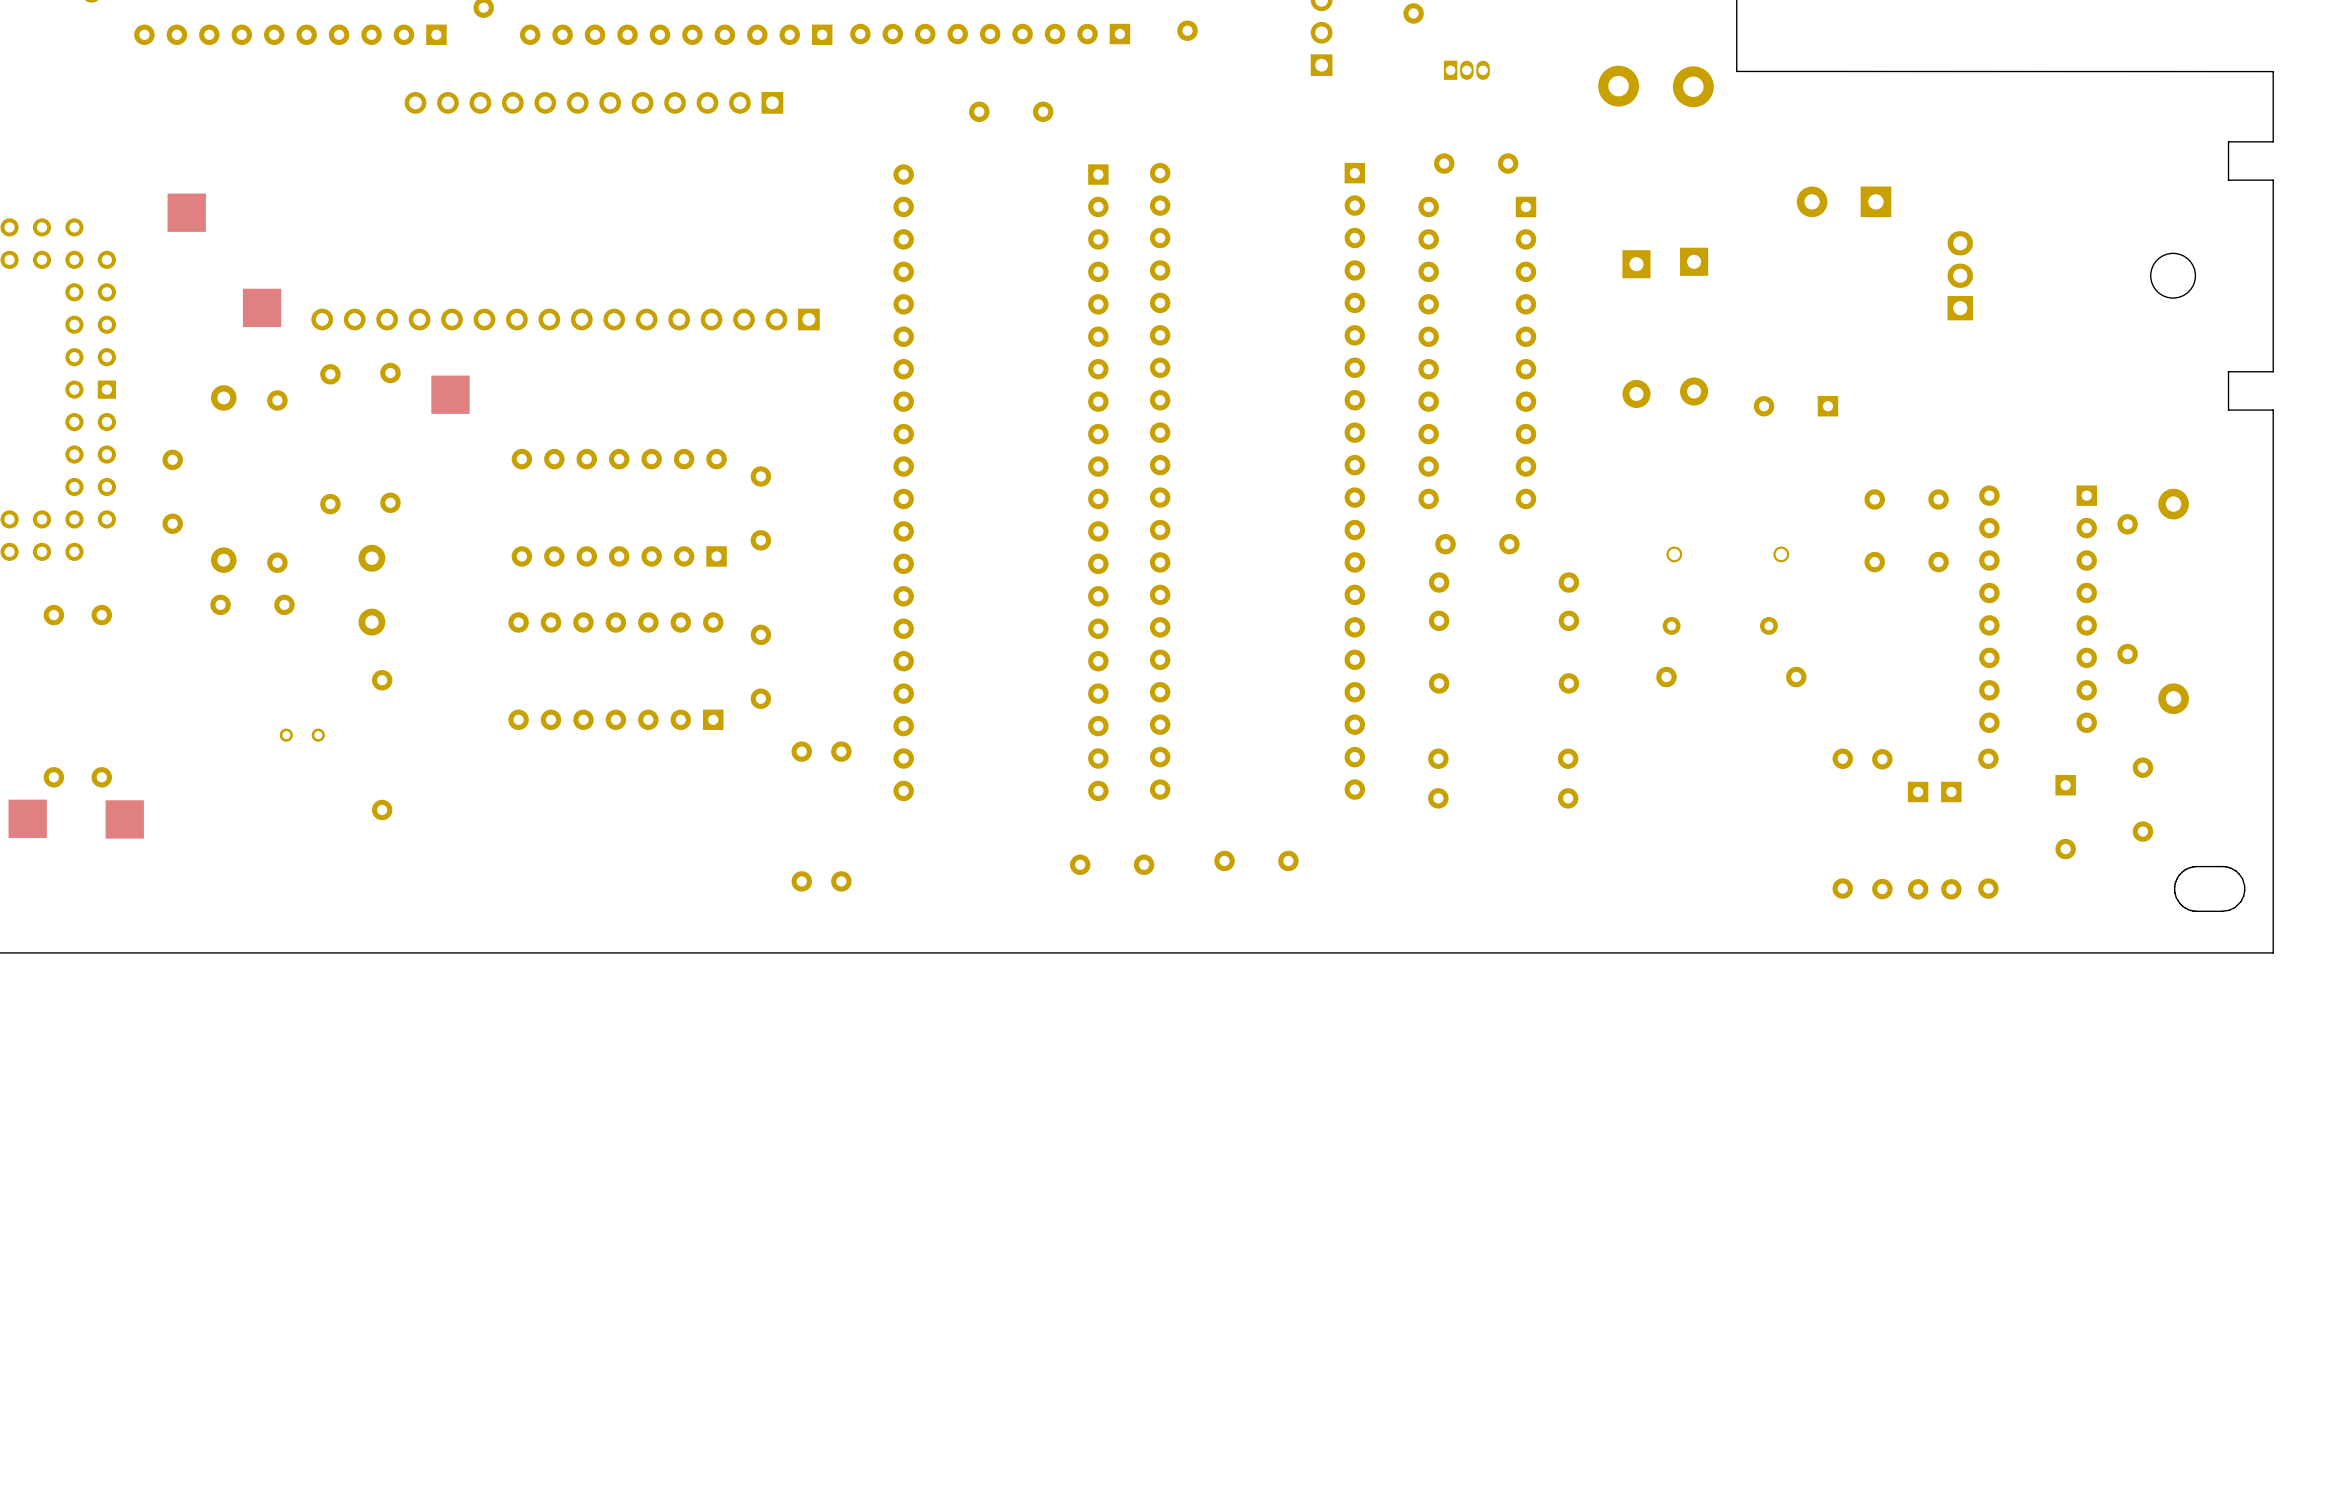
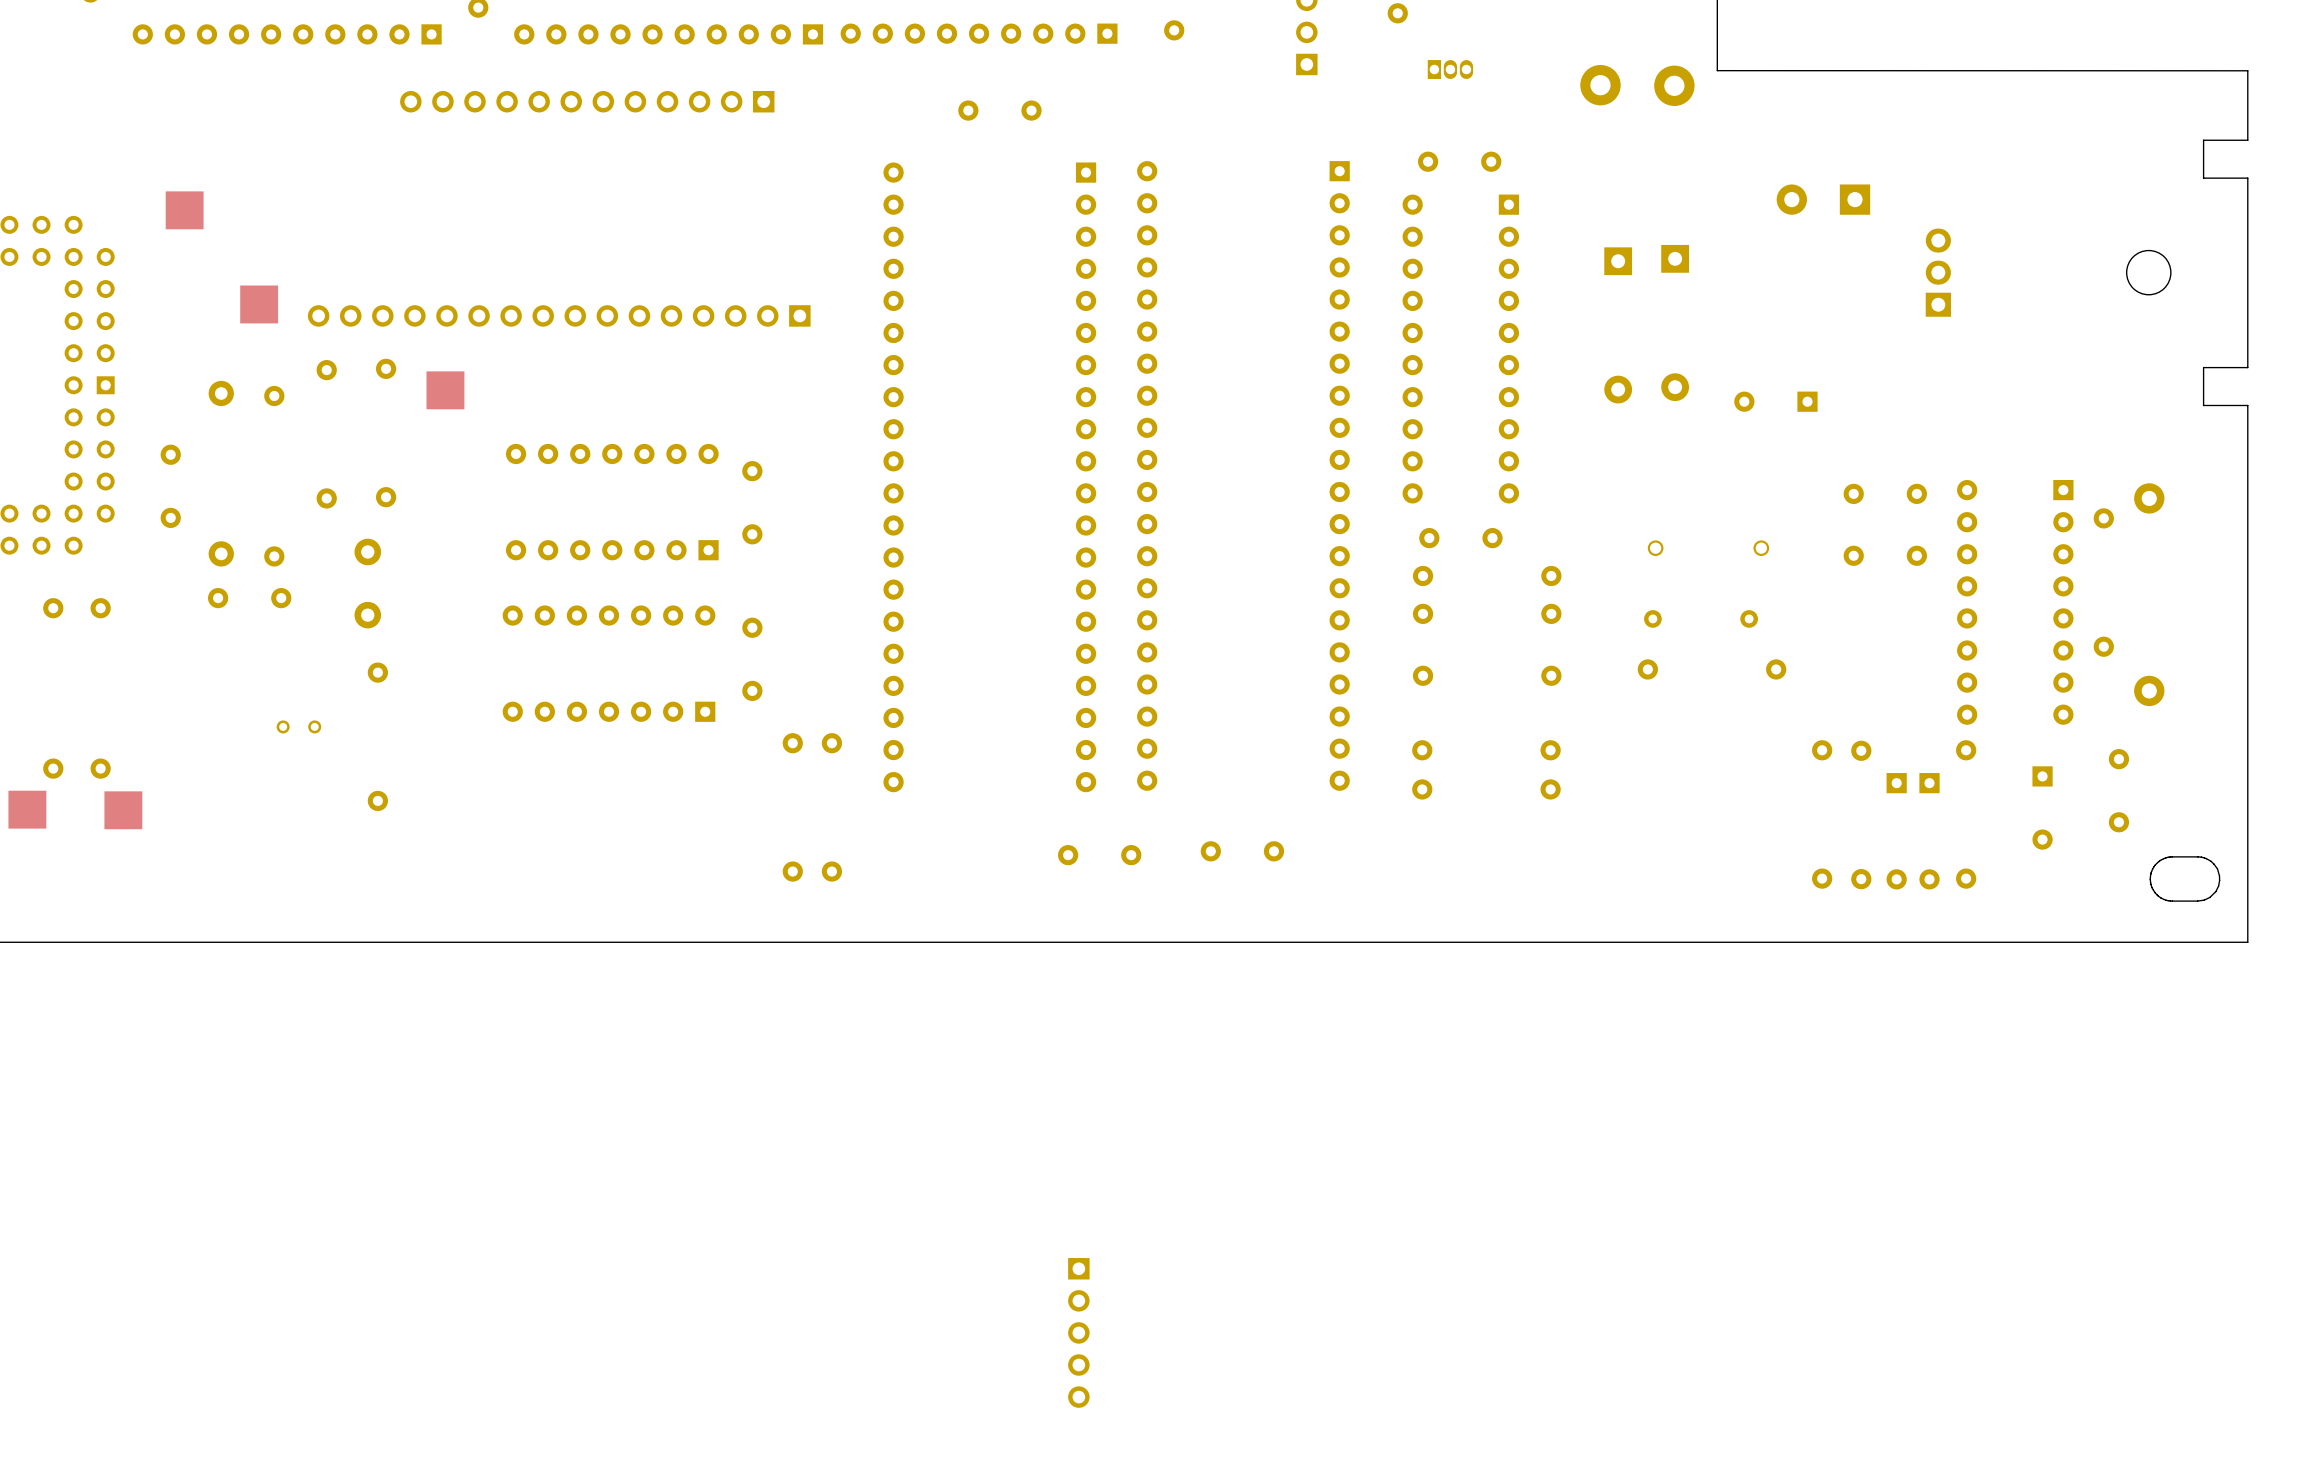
part: none -> (1078, 1332)

